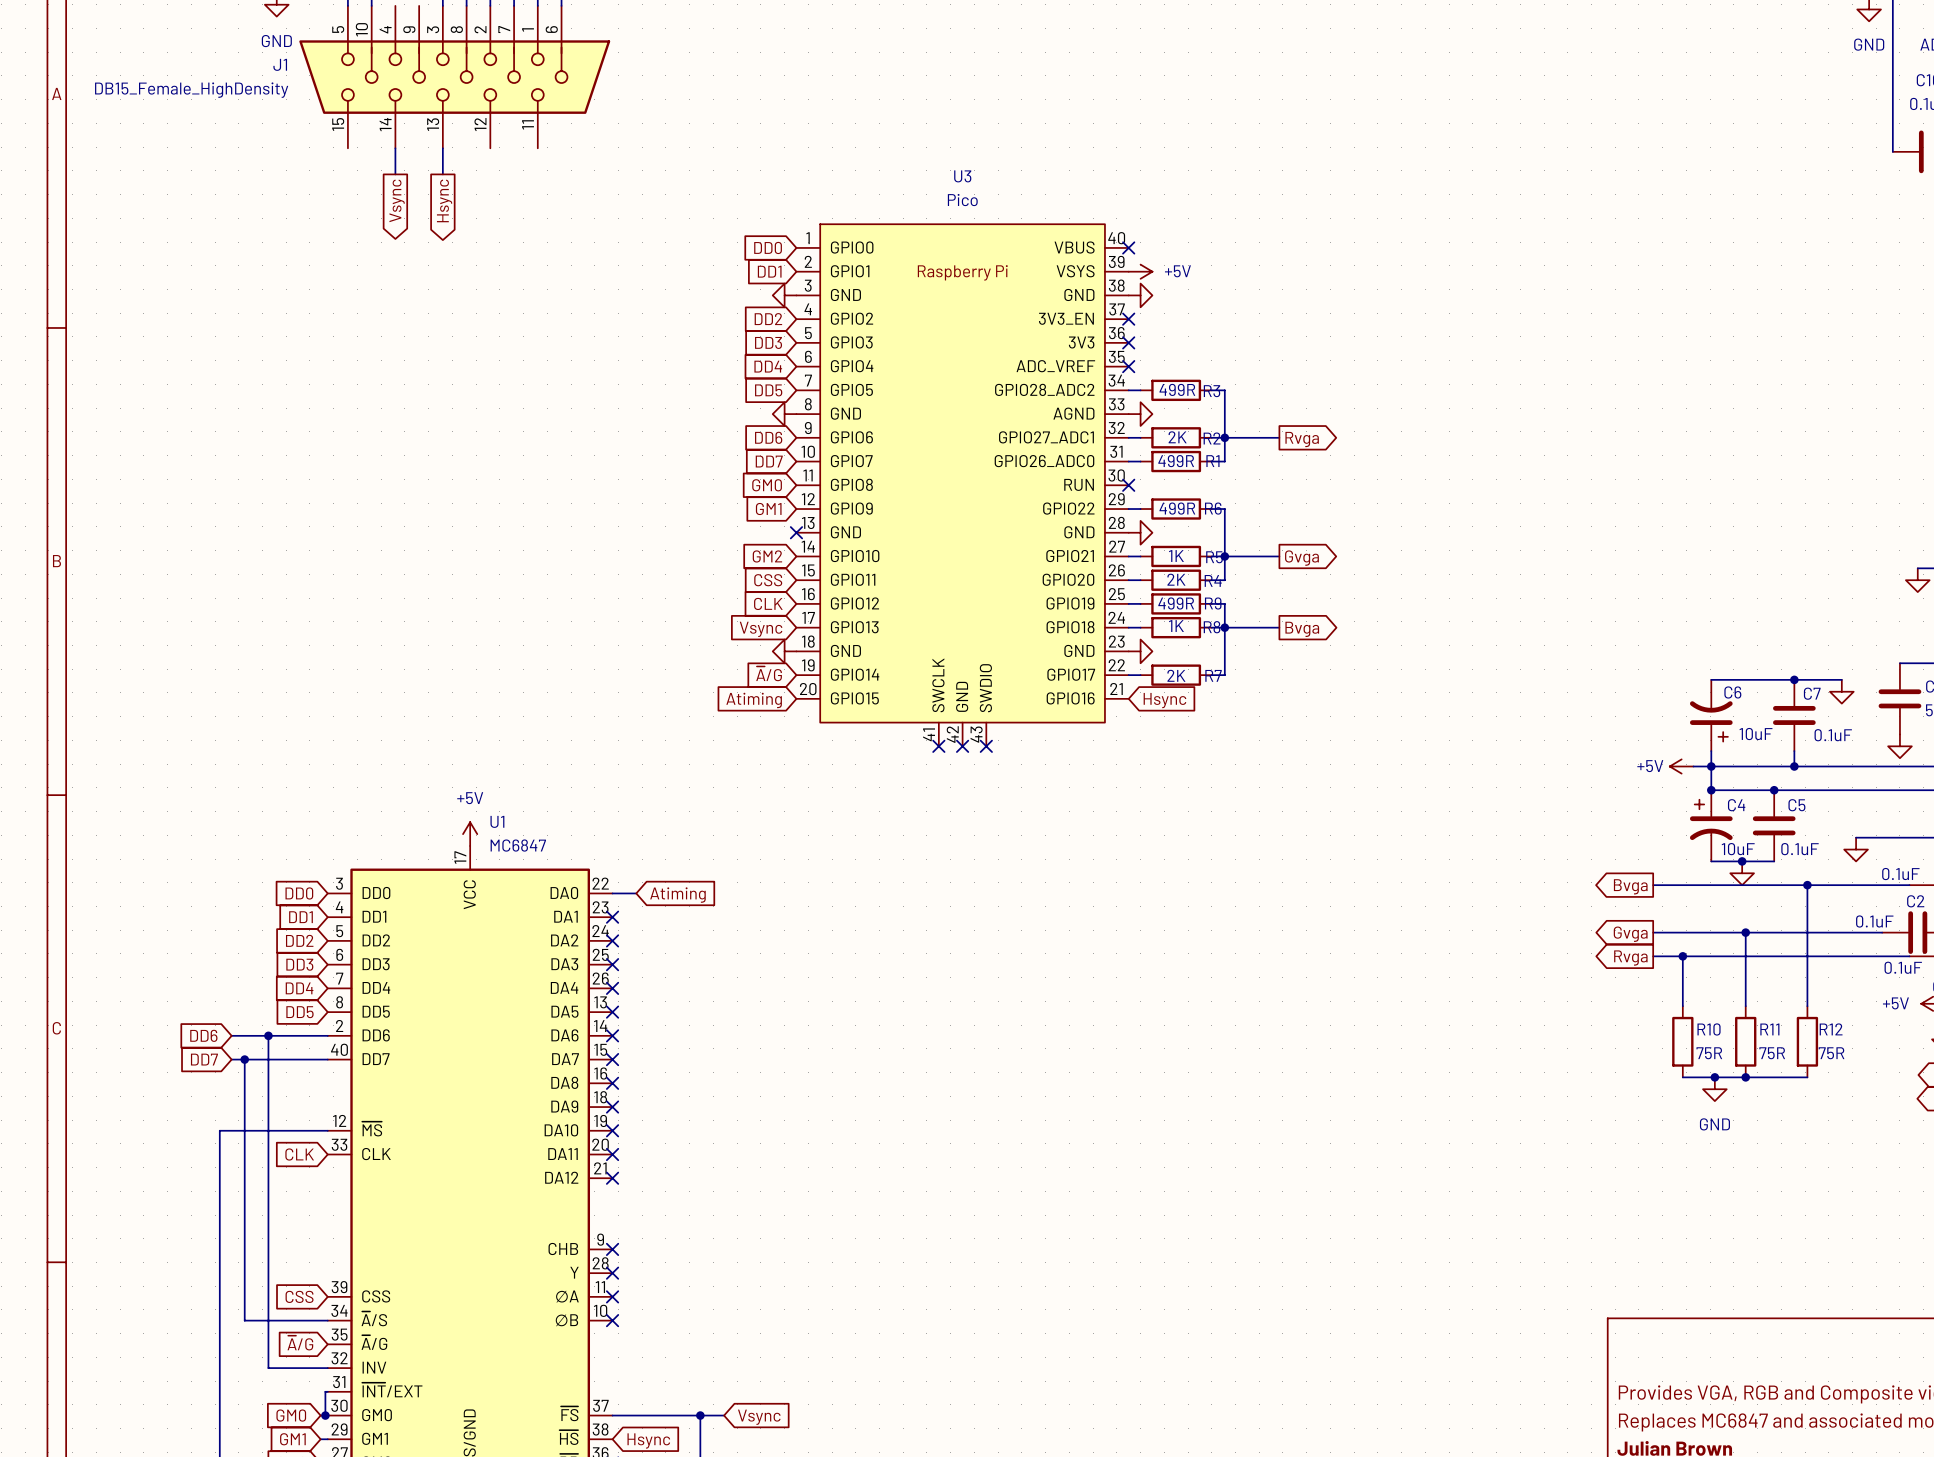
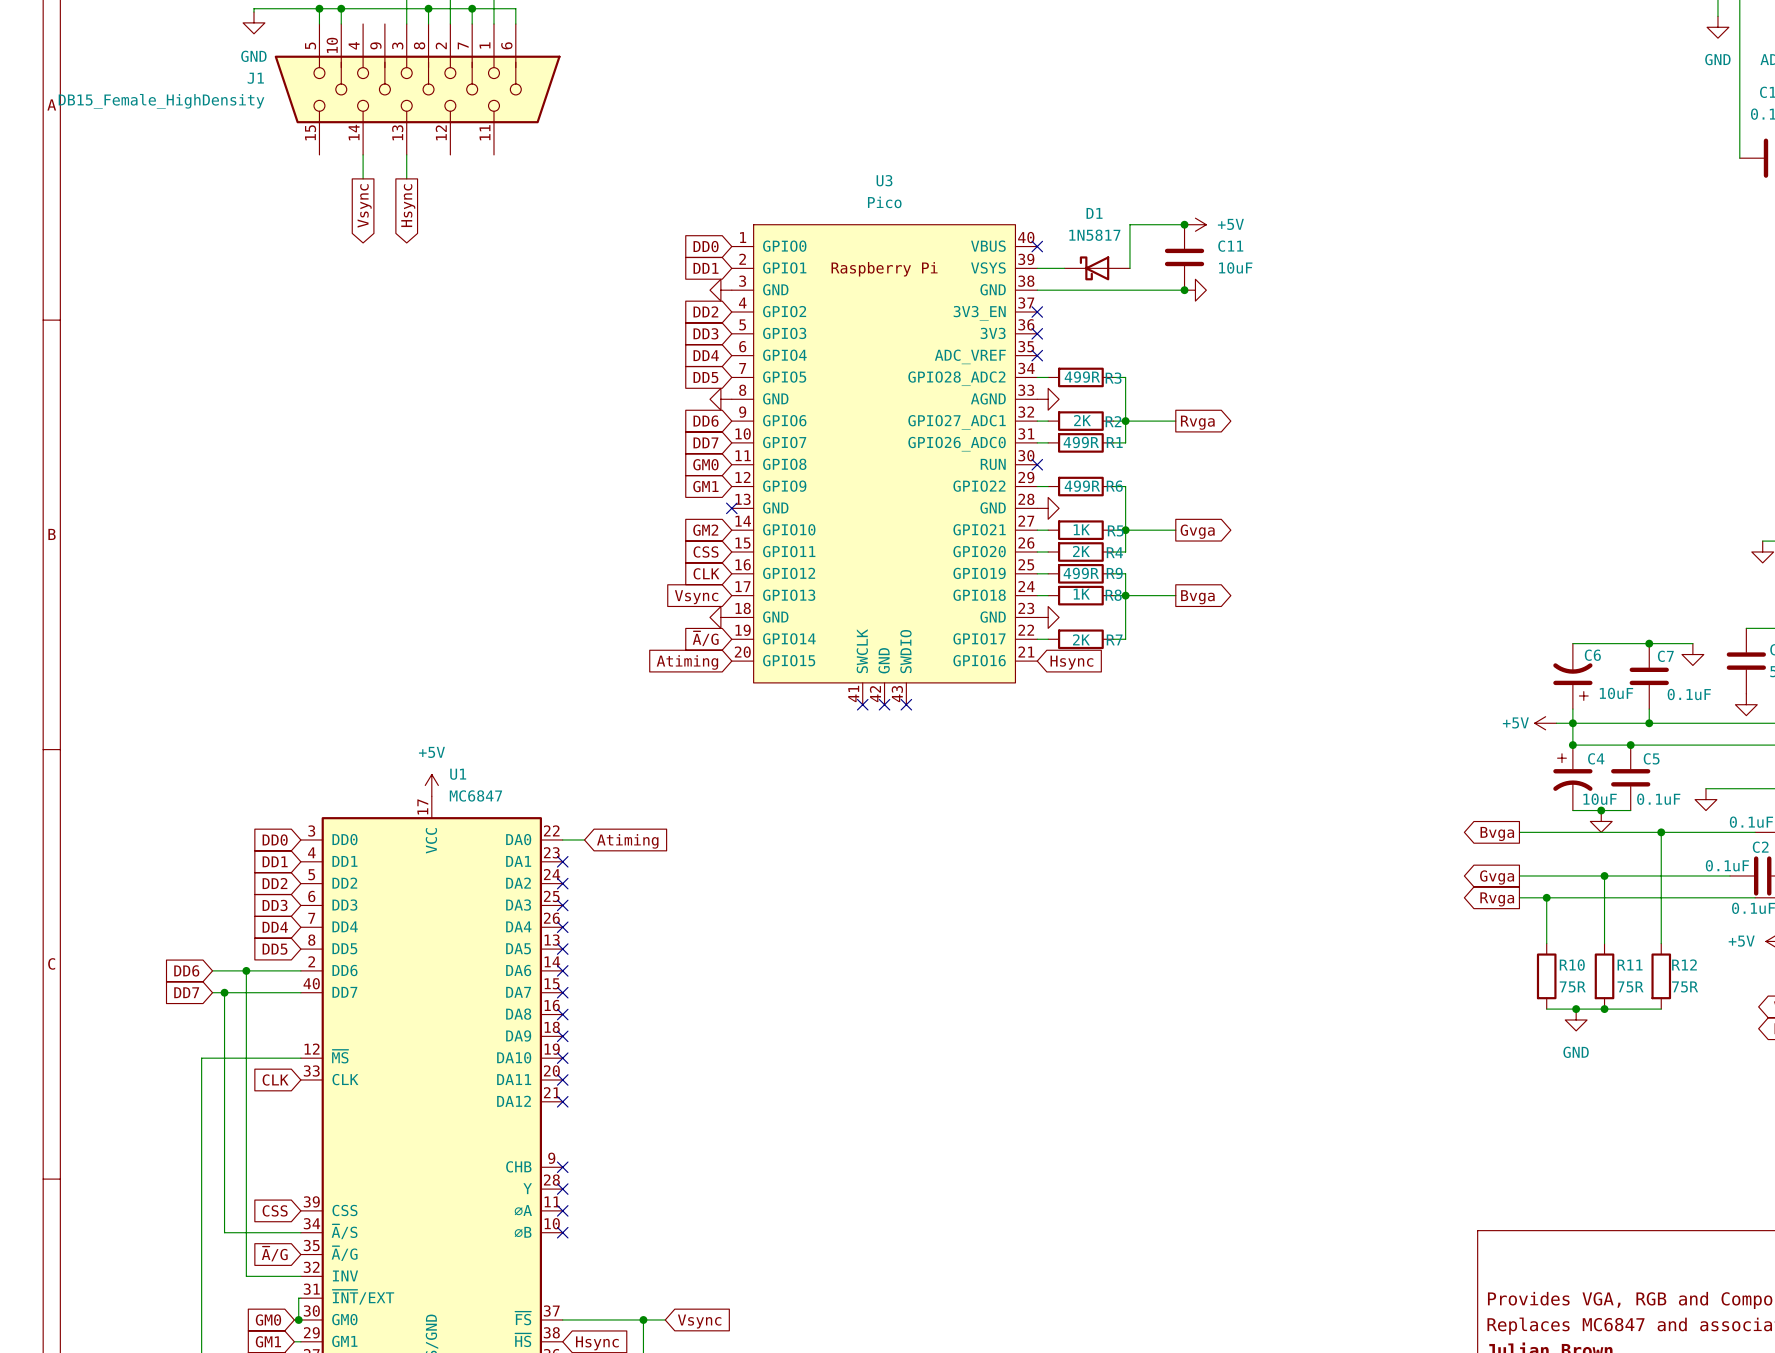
wire: none -> (1184, 224) (1129, 224) (1129, 268)
junction: none -> (1184, 224)
C11: none -> 10uF (1184, 257)
power symbol position: +5V (1140, 271) -> +5V (1195, 224)
D1: none -> 1N5817 (1097, 268)
wire: none -> (1037, 290) (1184, 290)
power symbol position: (1140, 295) -> (1195, 290)
junction: none -> (1184, 290)

